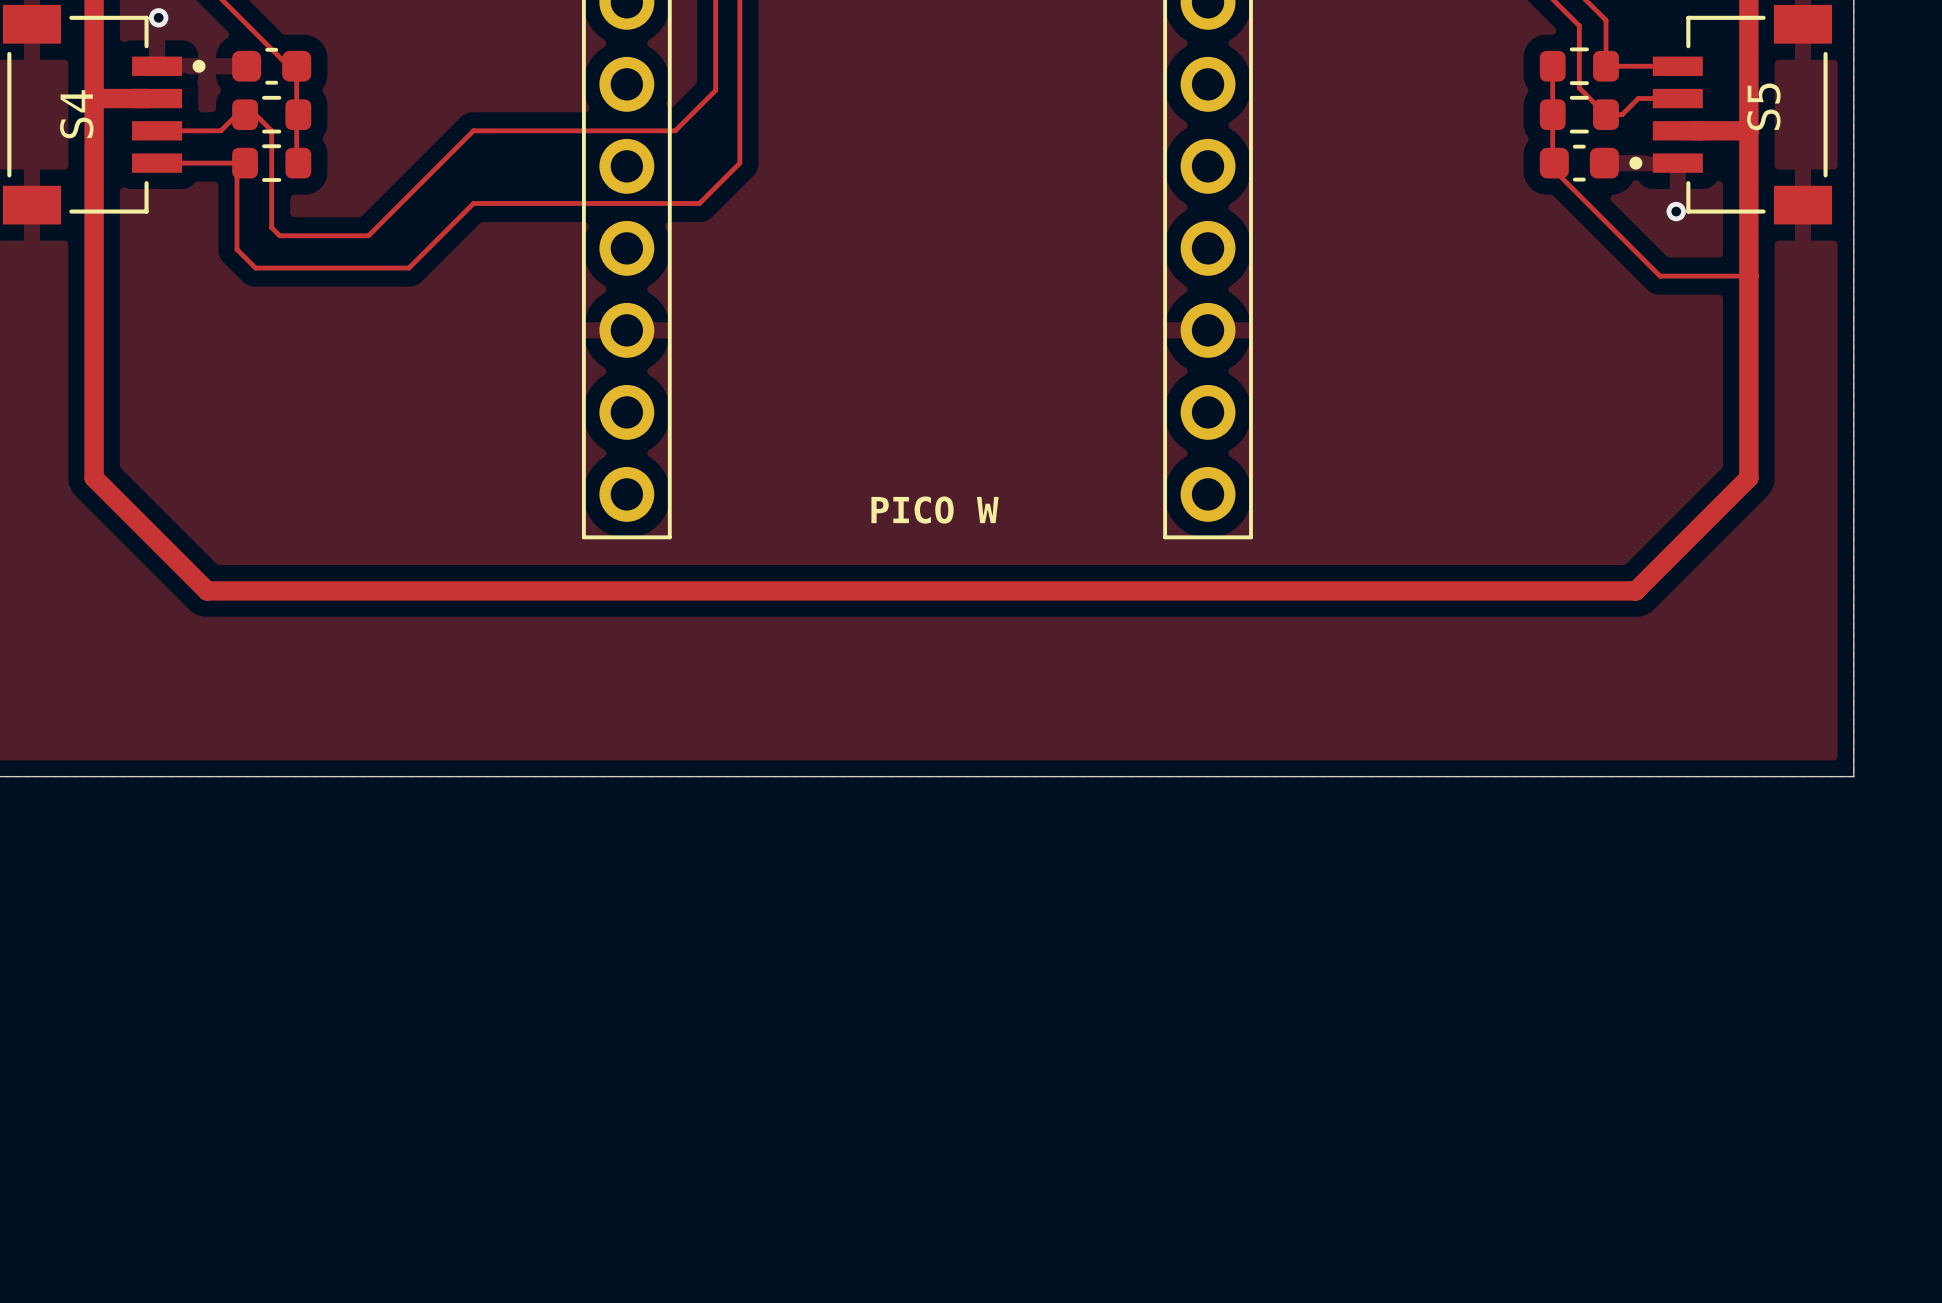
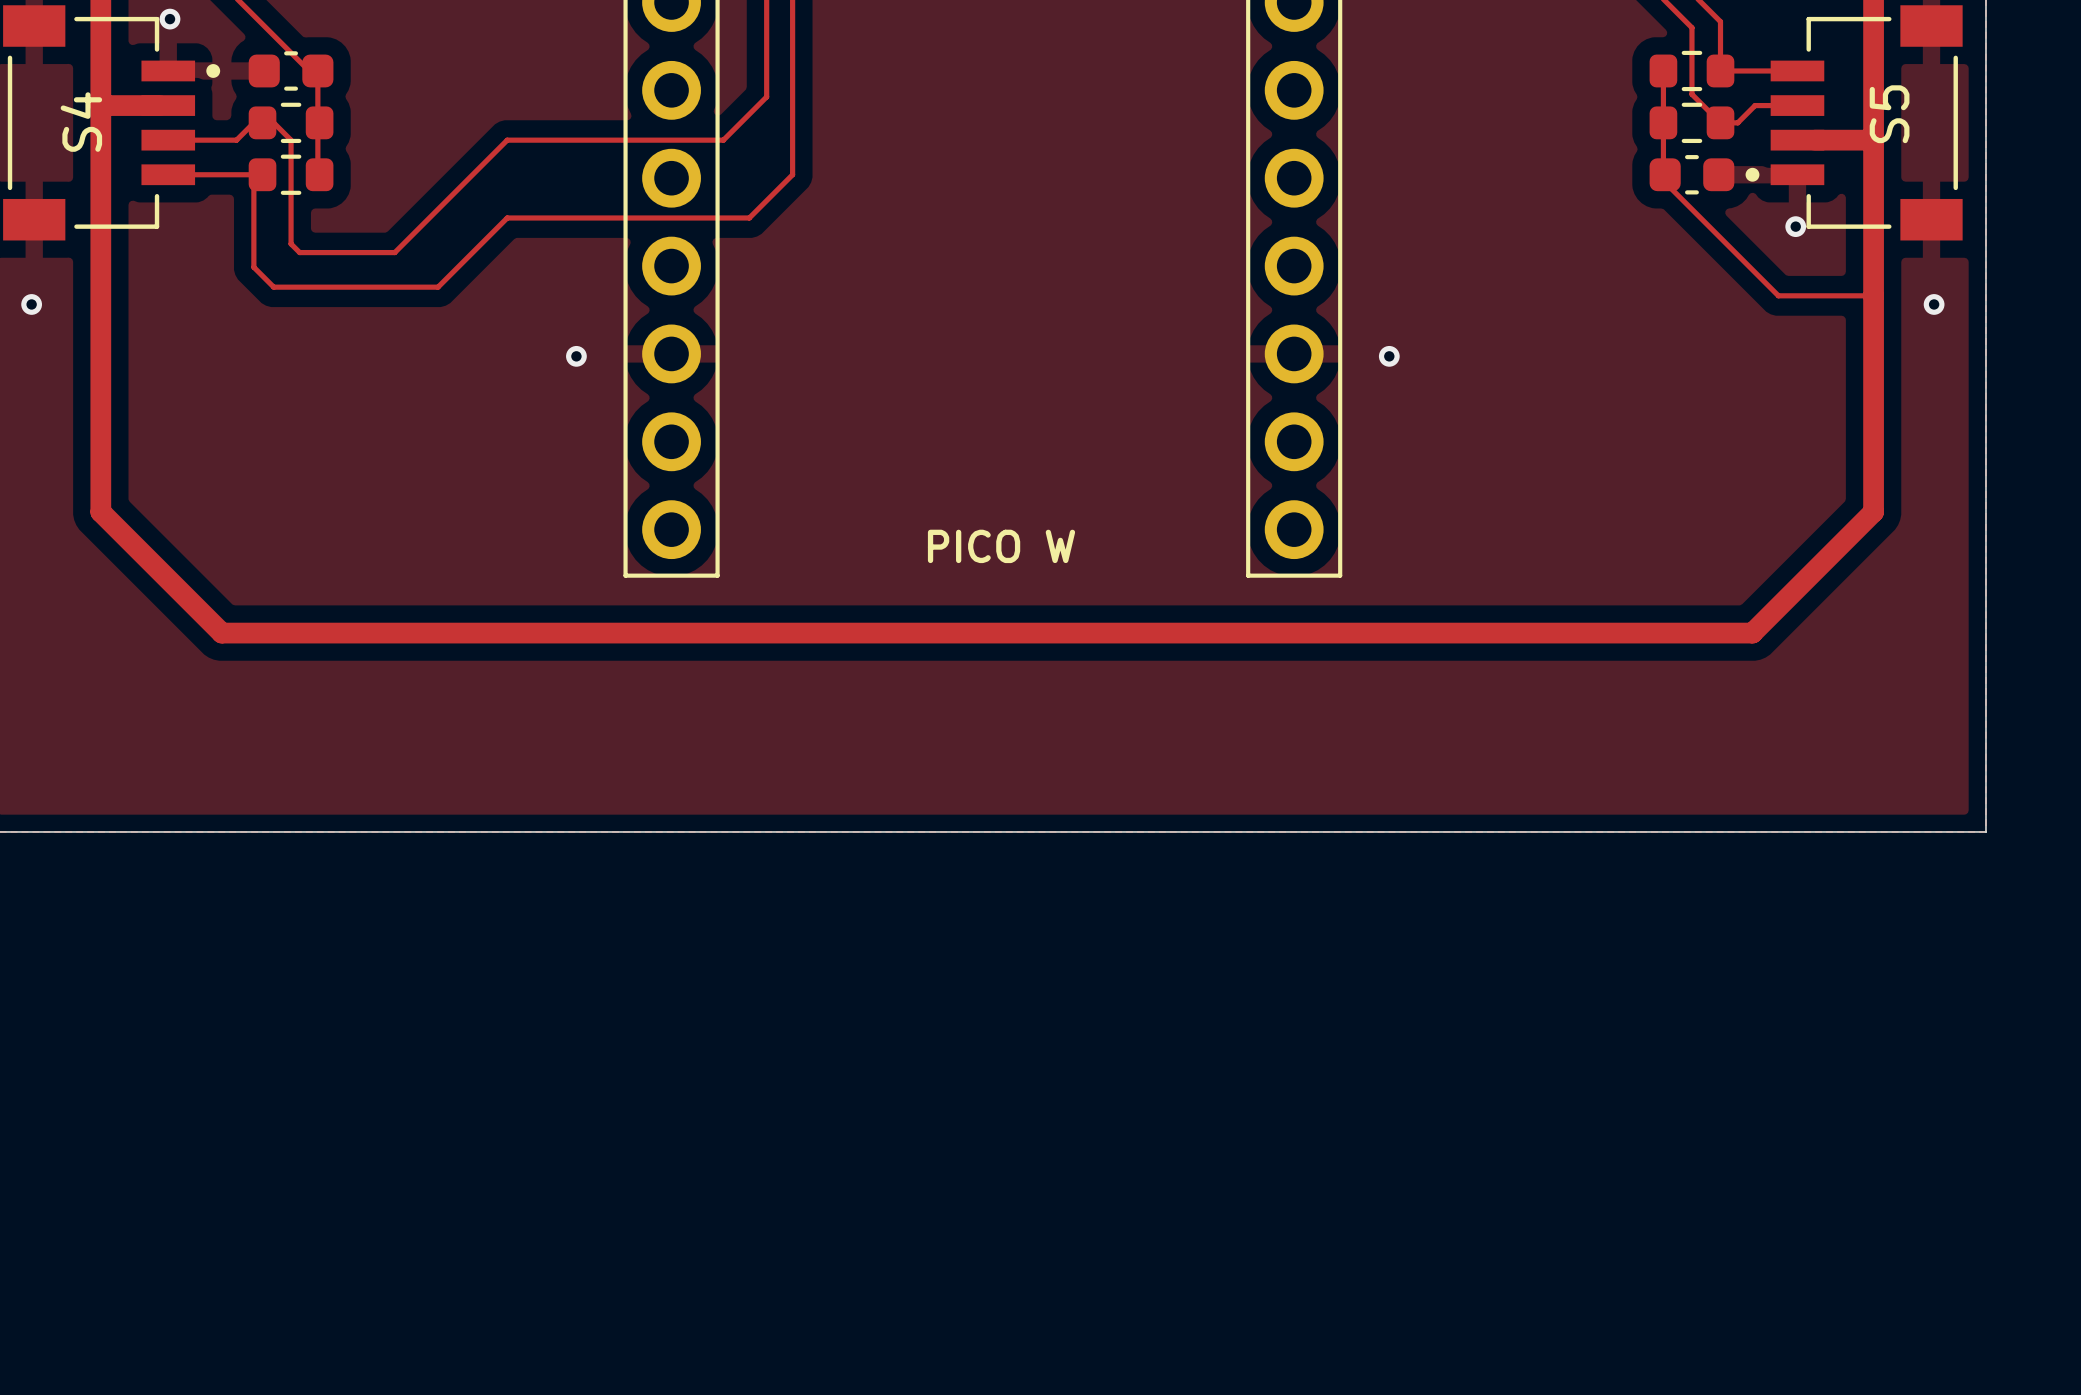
via: none -> (31, 304)
via: none -> (1934, 304)
via: none -> (576, 356)
via: none -> (1389, 356)

